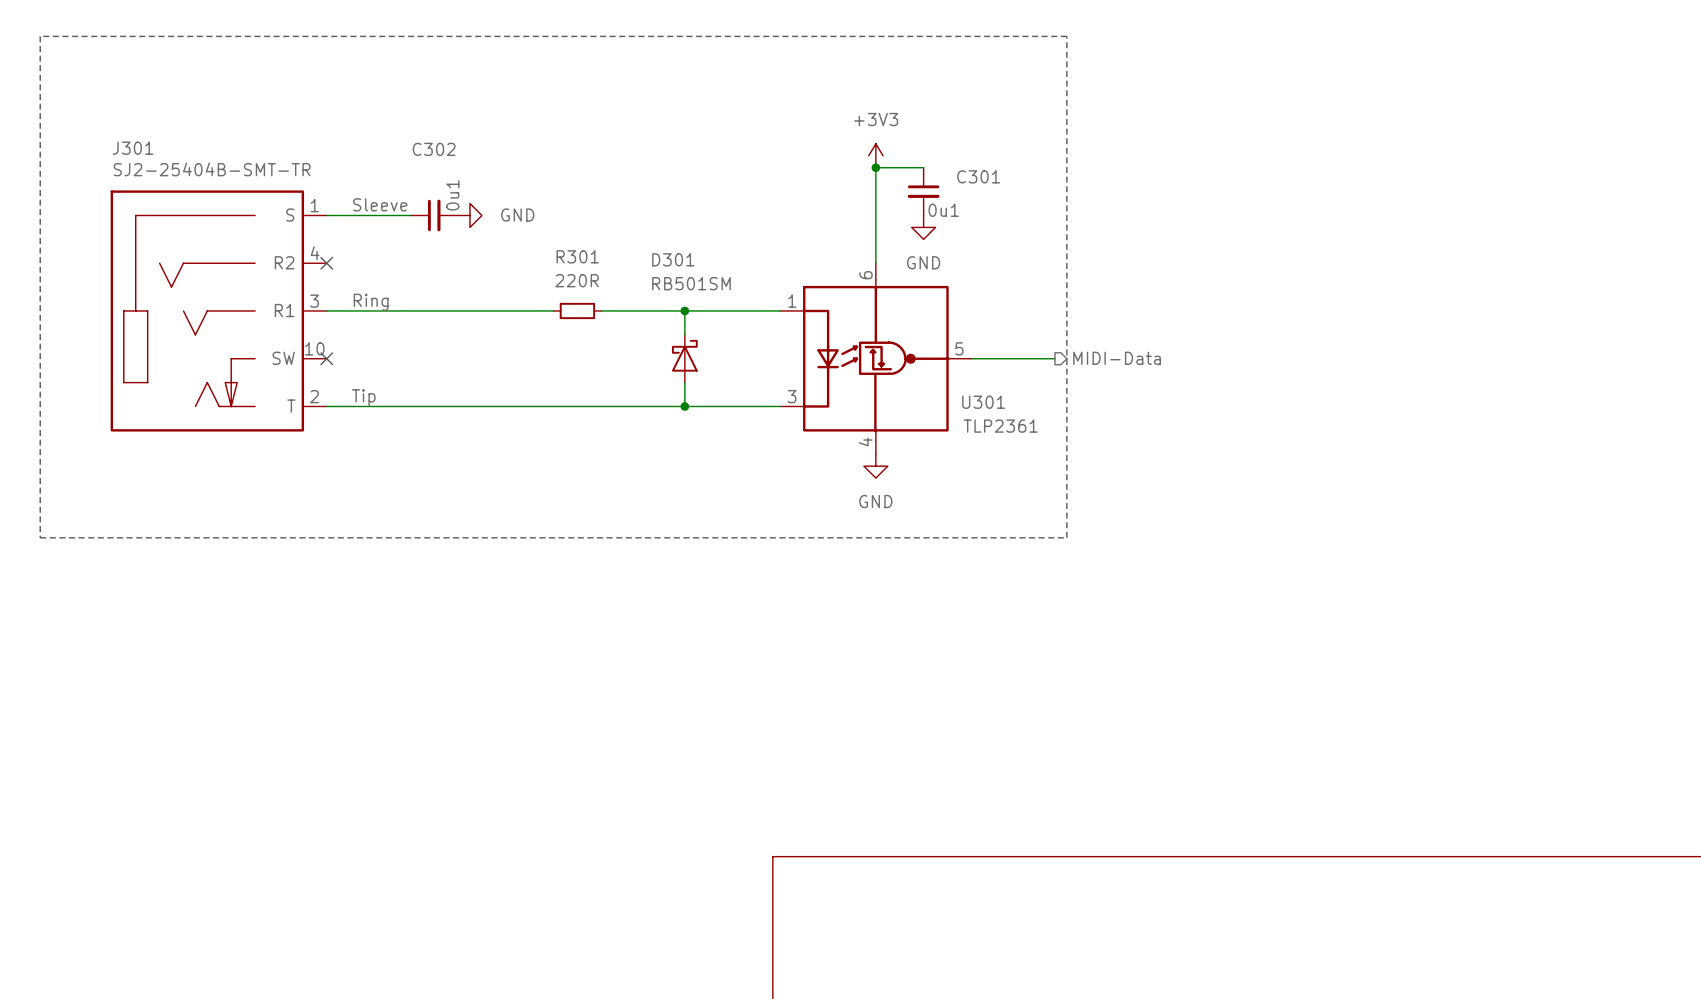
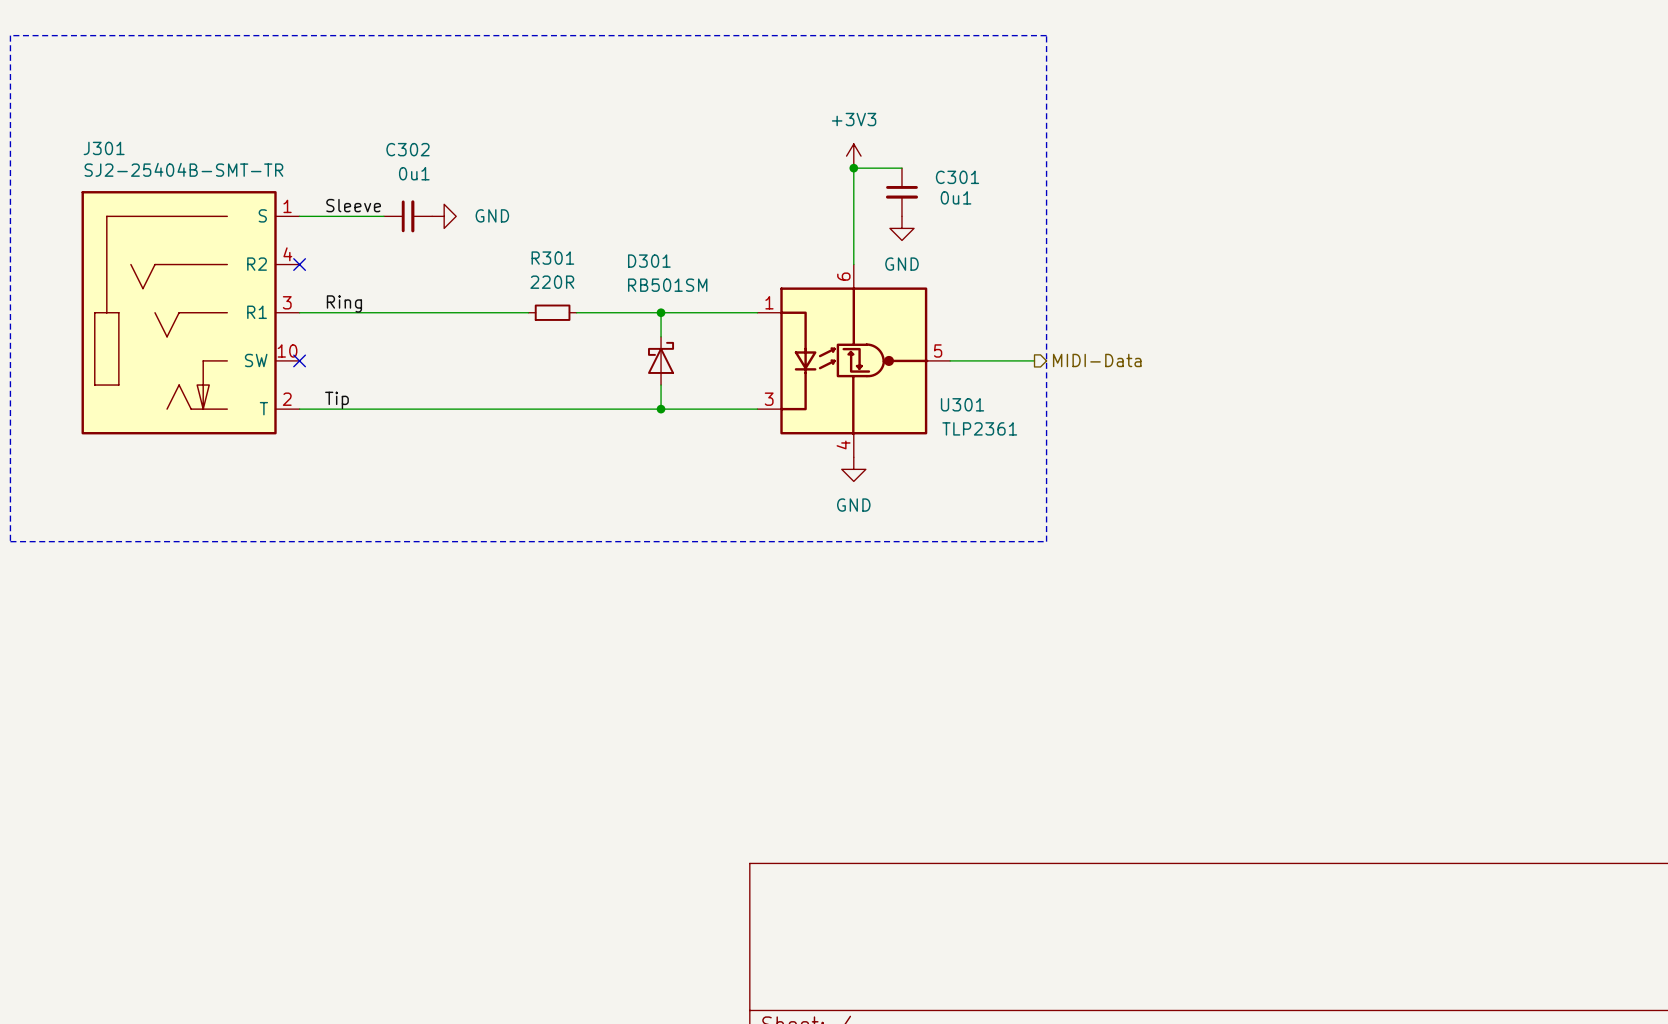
C302 value rotation: 0° (452, 195) -> 90° clockwise (414, 173)
C301 value position: 0u1 (943, 210) -> 0u1 (956, 197)

